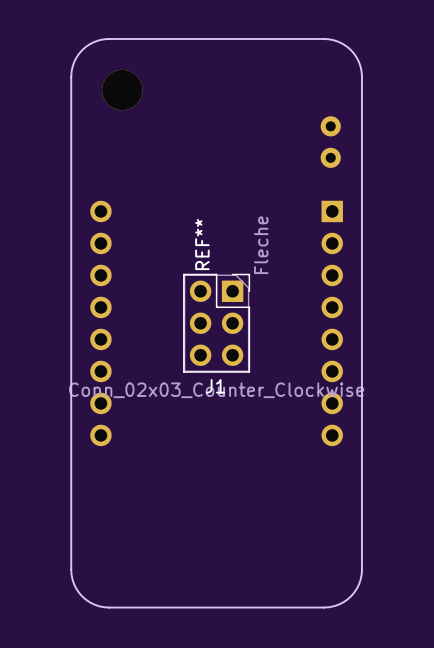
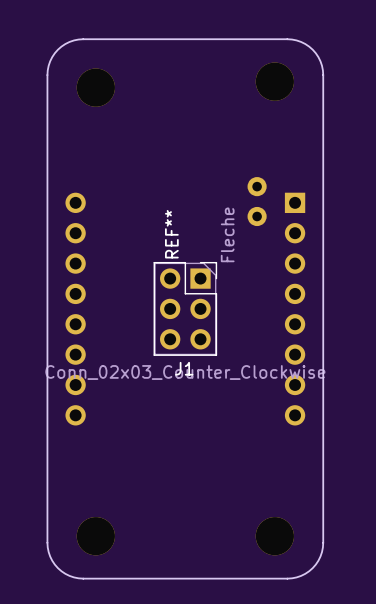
part: none -> (274, 81)
part position: (330, 142) -> (257, 201)
part: none -> (95, 536)
part: none -> (274, 536)

